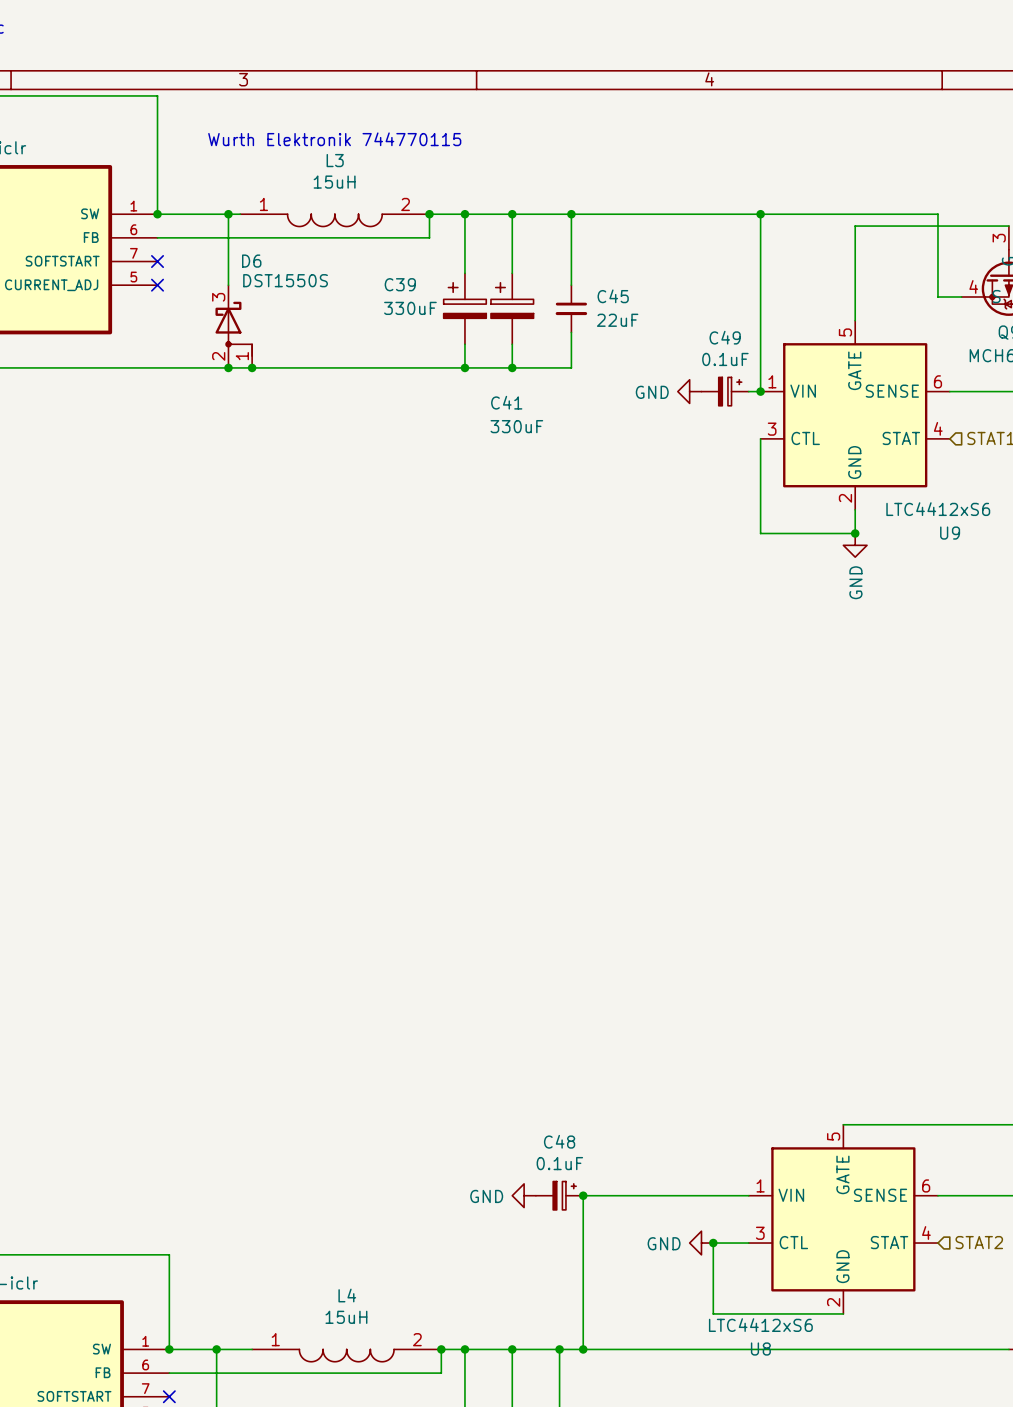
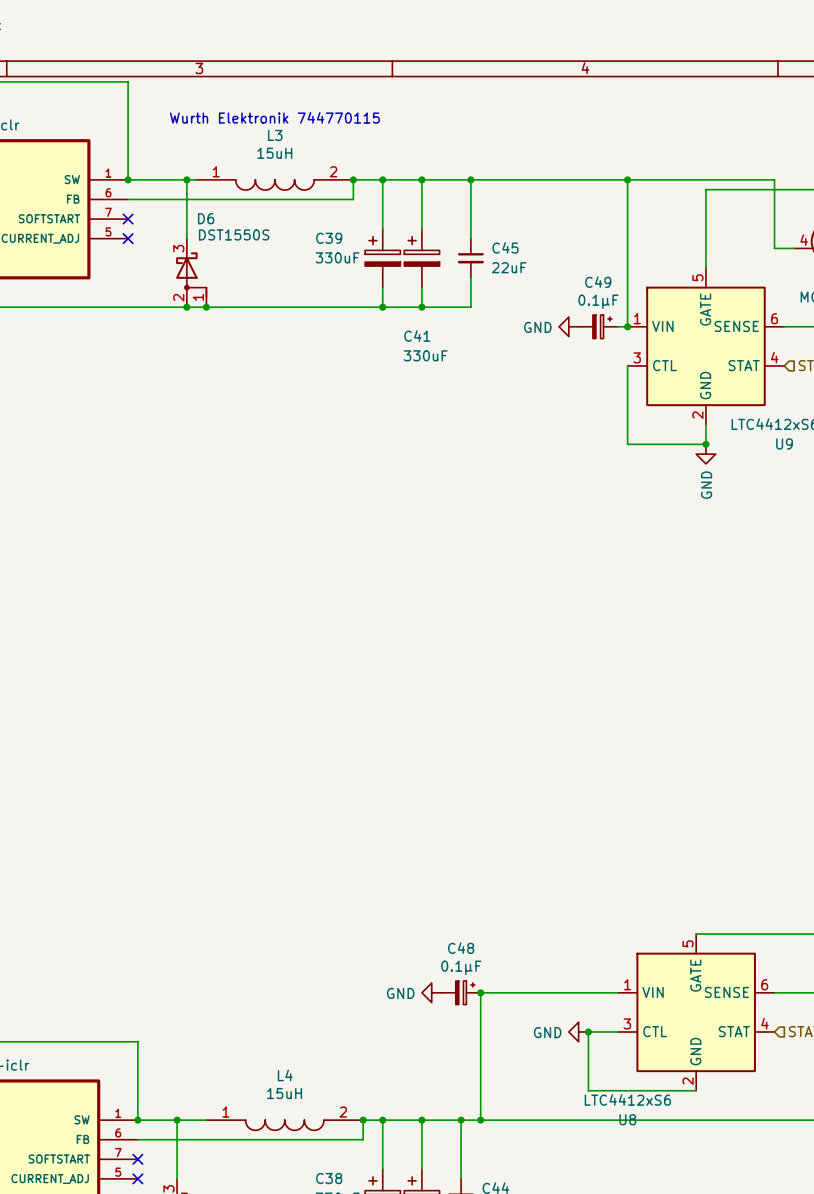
C49 value: 0.1uF (725, 359) -> 0.1µF (598, 301)
C48 value: 0.1uF (559, 1163) -> 0.1µF (461, 967)

